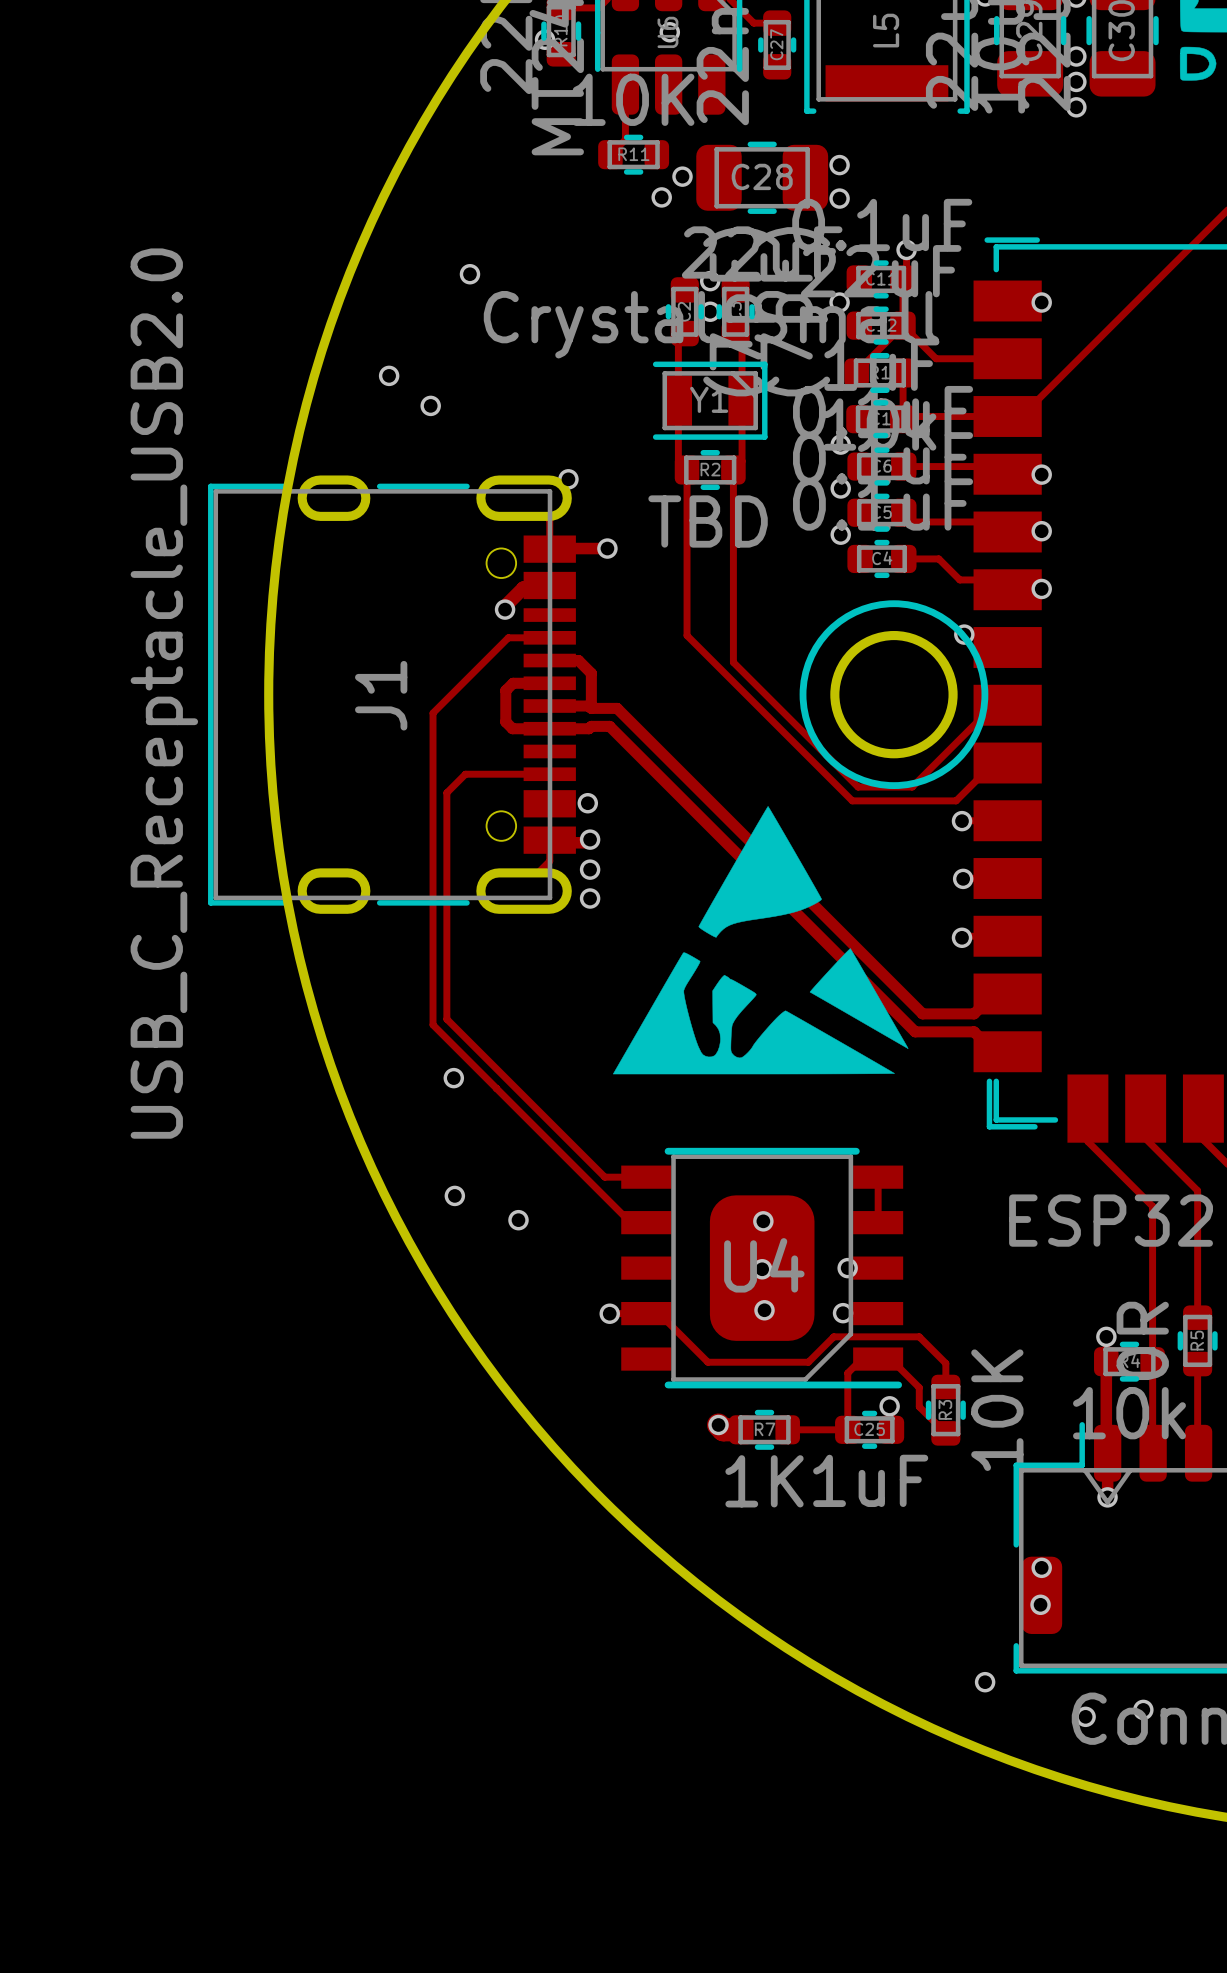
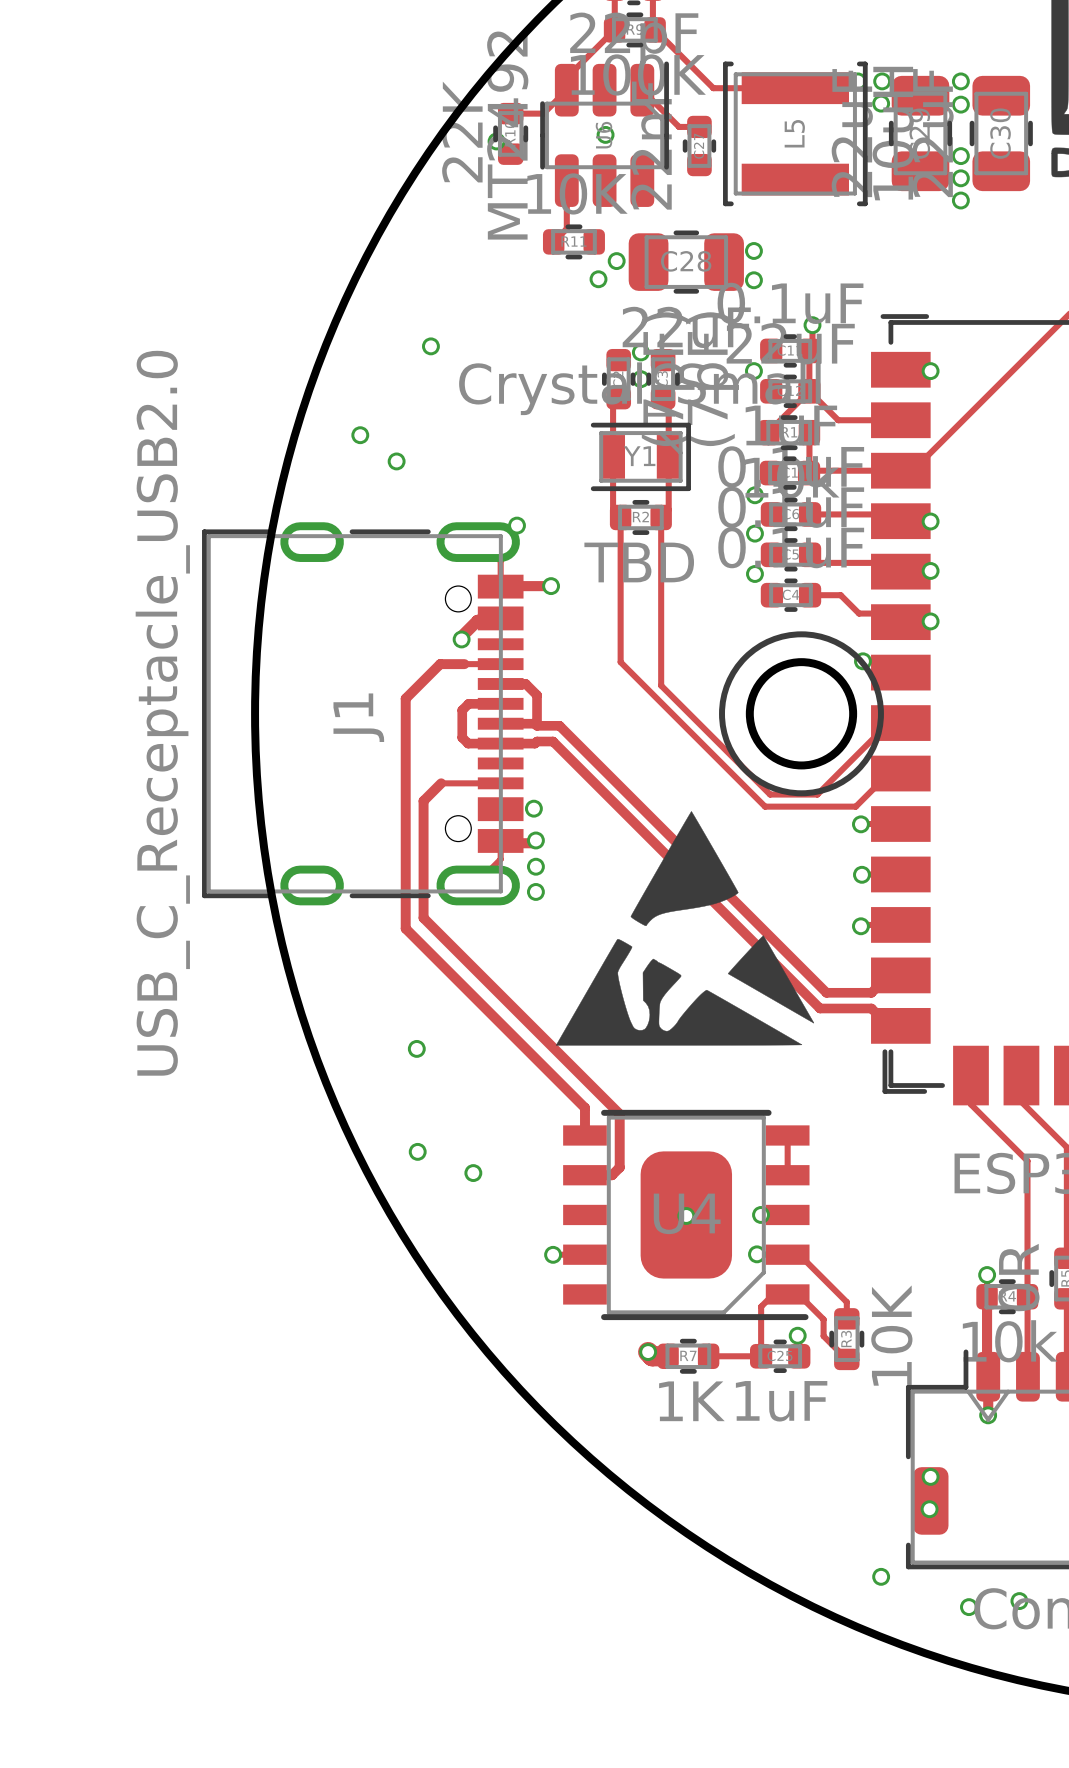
track: (508, 637) (433, 713) (433, 1024) (630, 1222) (646, 1222) -> (464, 664) (440, 664) (405, 698) (405, 928) (584, 1107) (584, 1135)
track: (481, 774) (465, 774) (446, 792) (446, 1019) (604, 1177) (646, 1177) -> (441, 783) (423, 800) (423, 918) (619, 1114) (619, 1167) (612, 1175) (584, 1175)
via: (763, 1221) -> none
via: (764, 1310) -> none
track: (646, 1313) (659, 1313) (707, 1362) (808, 1362) (833, 1336) (919, 1336) (945, 1363) (945, 1367) -> (799, 1254) (846, 1302)

